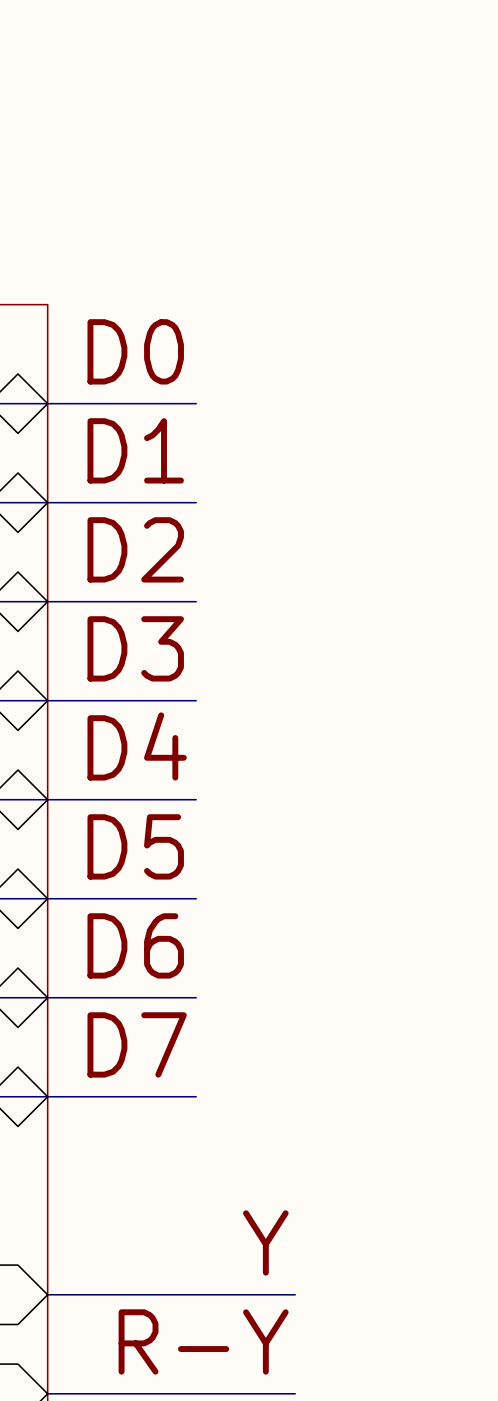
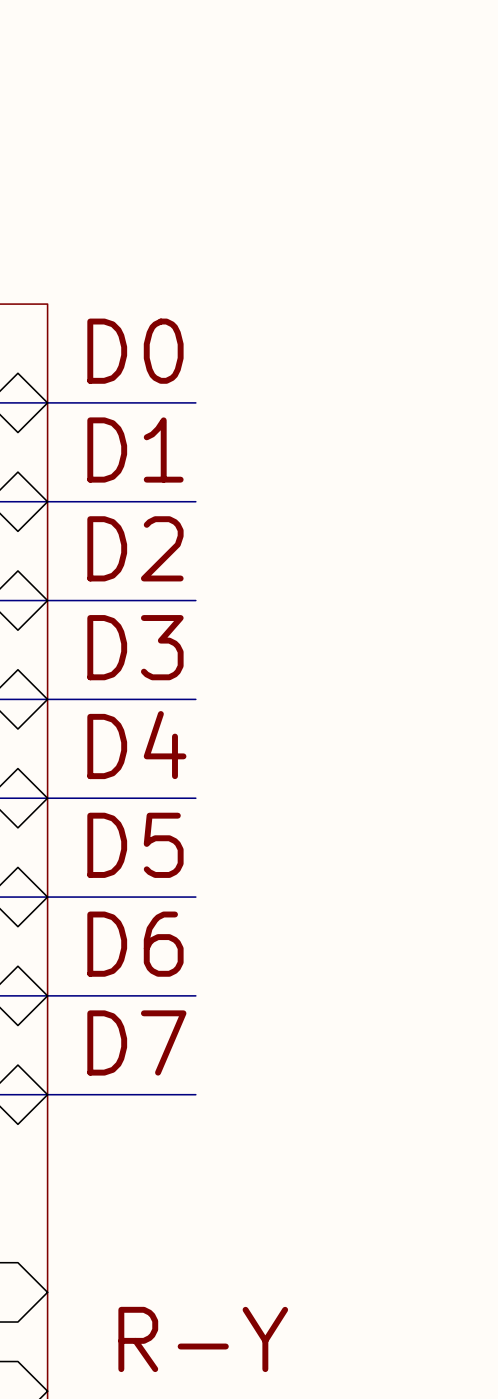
label: Y (265, 1242) -> none
wire: (47, 1294) (295, 1294) -> none
wire: (47, 1393) (295, 1393) -> none

